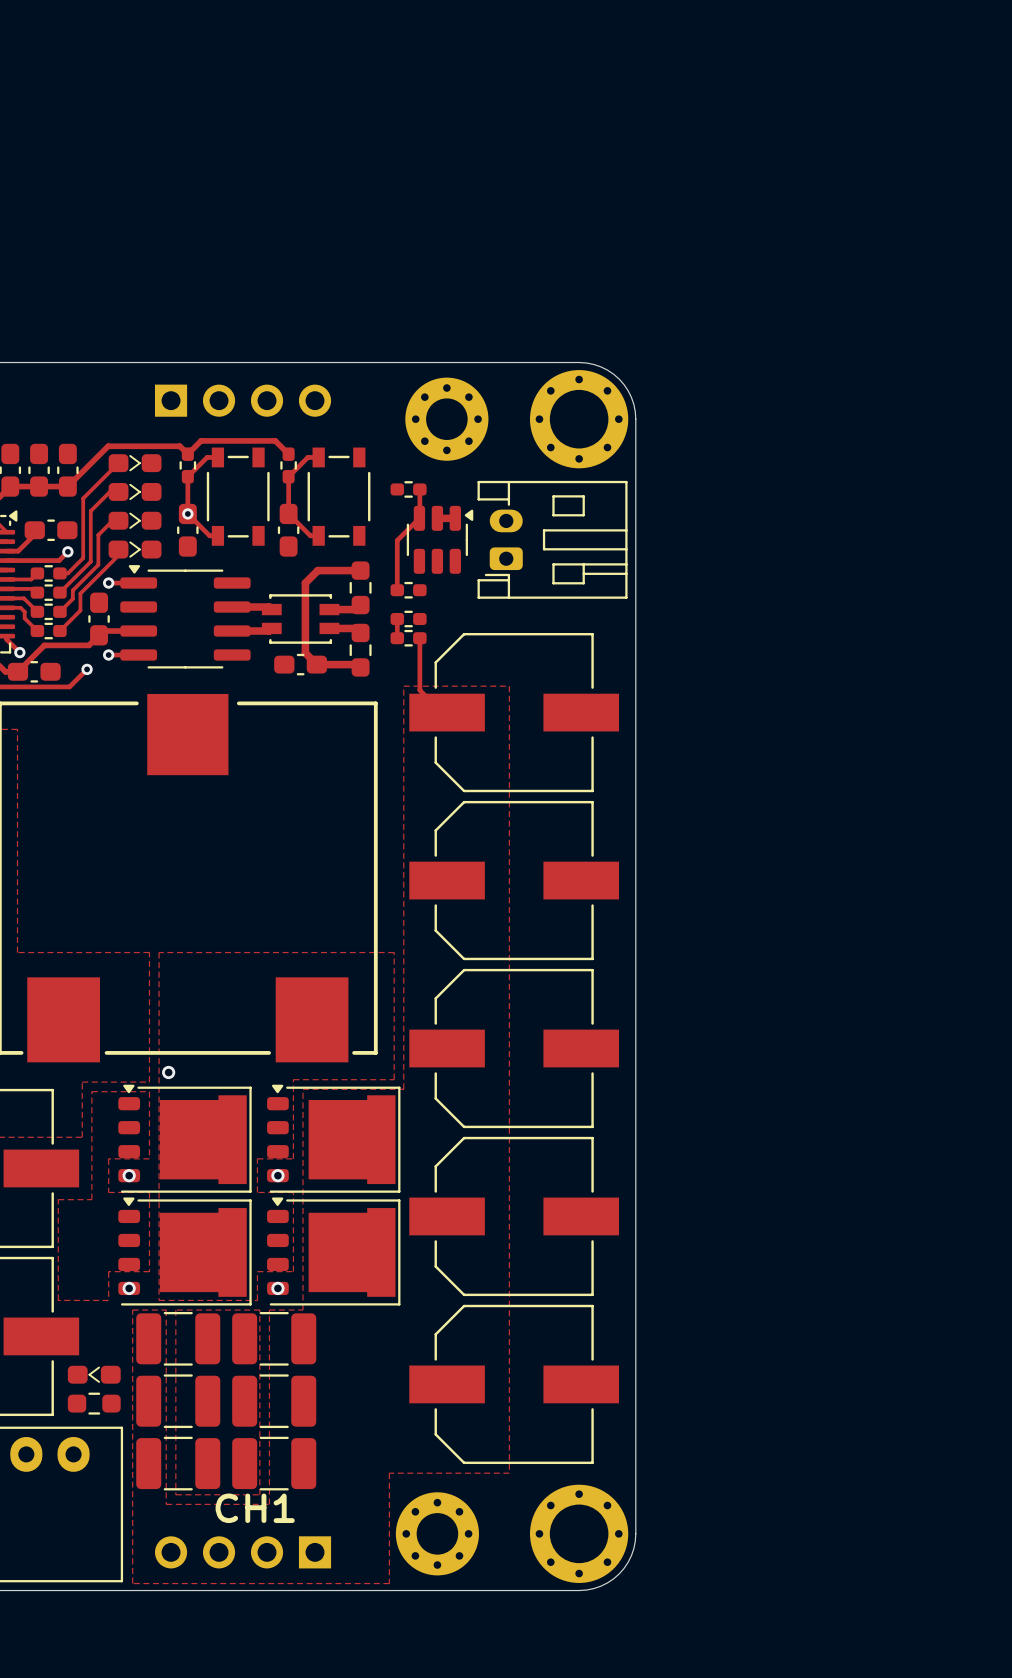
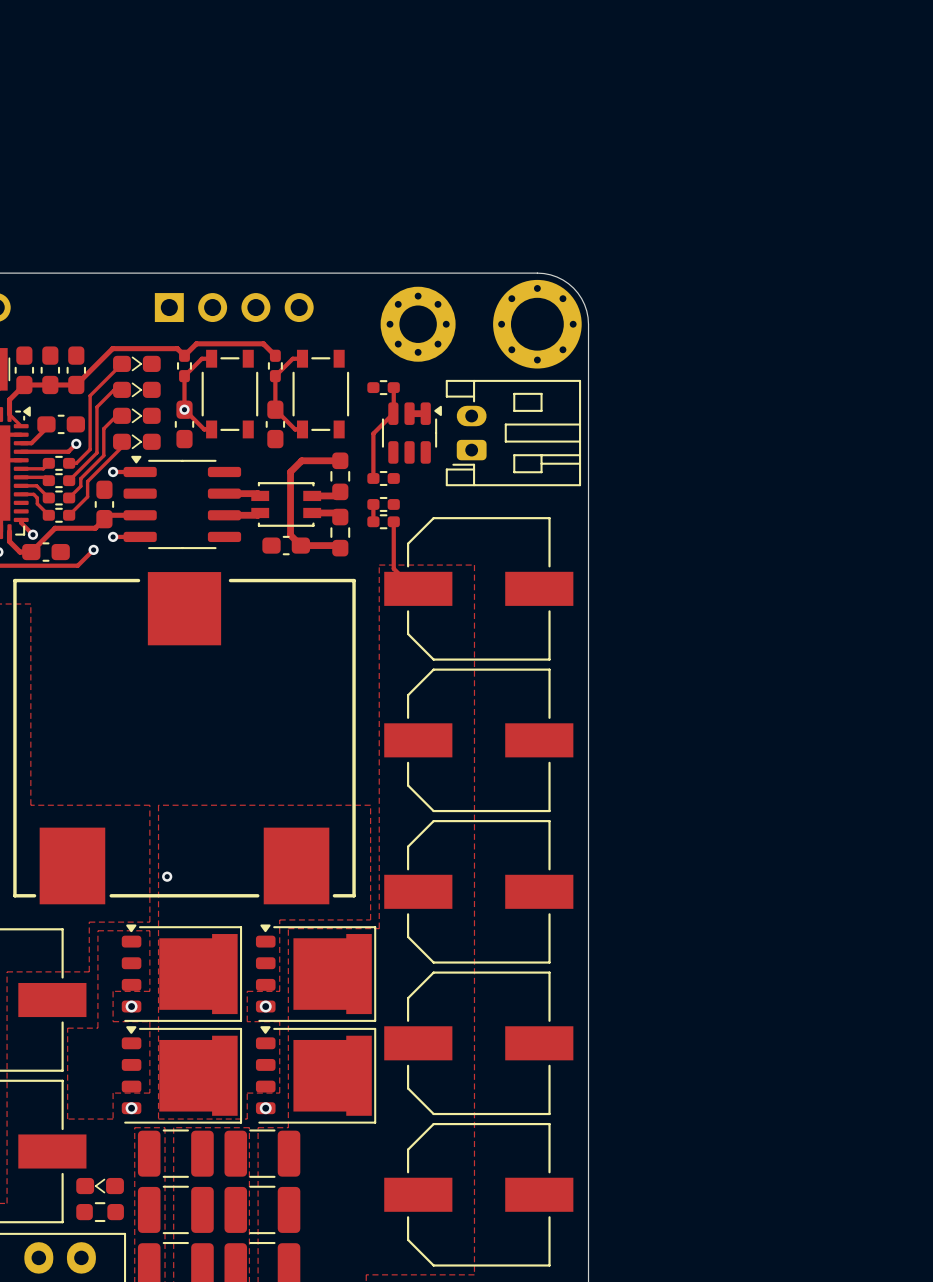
via: none -> (167, 876)
via: (168, 1072) -> none

